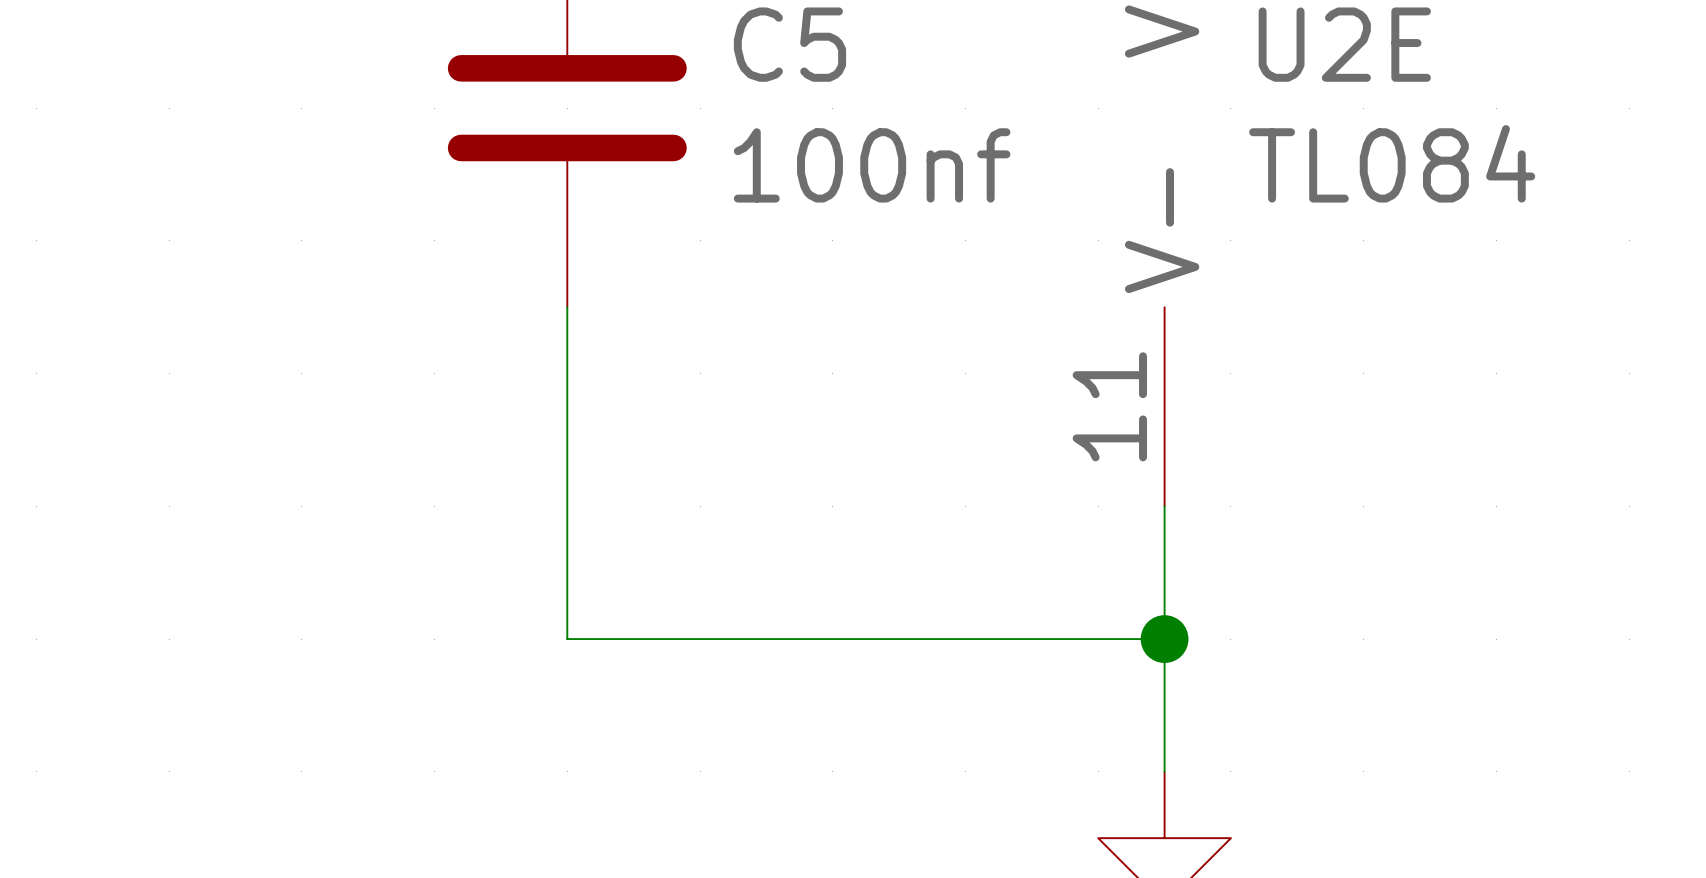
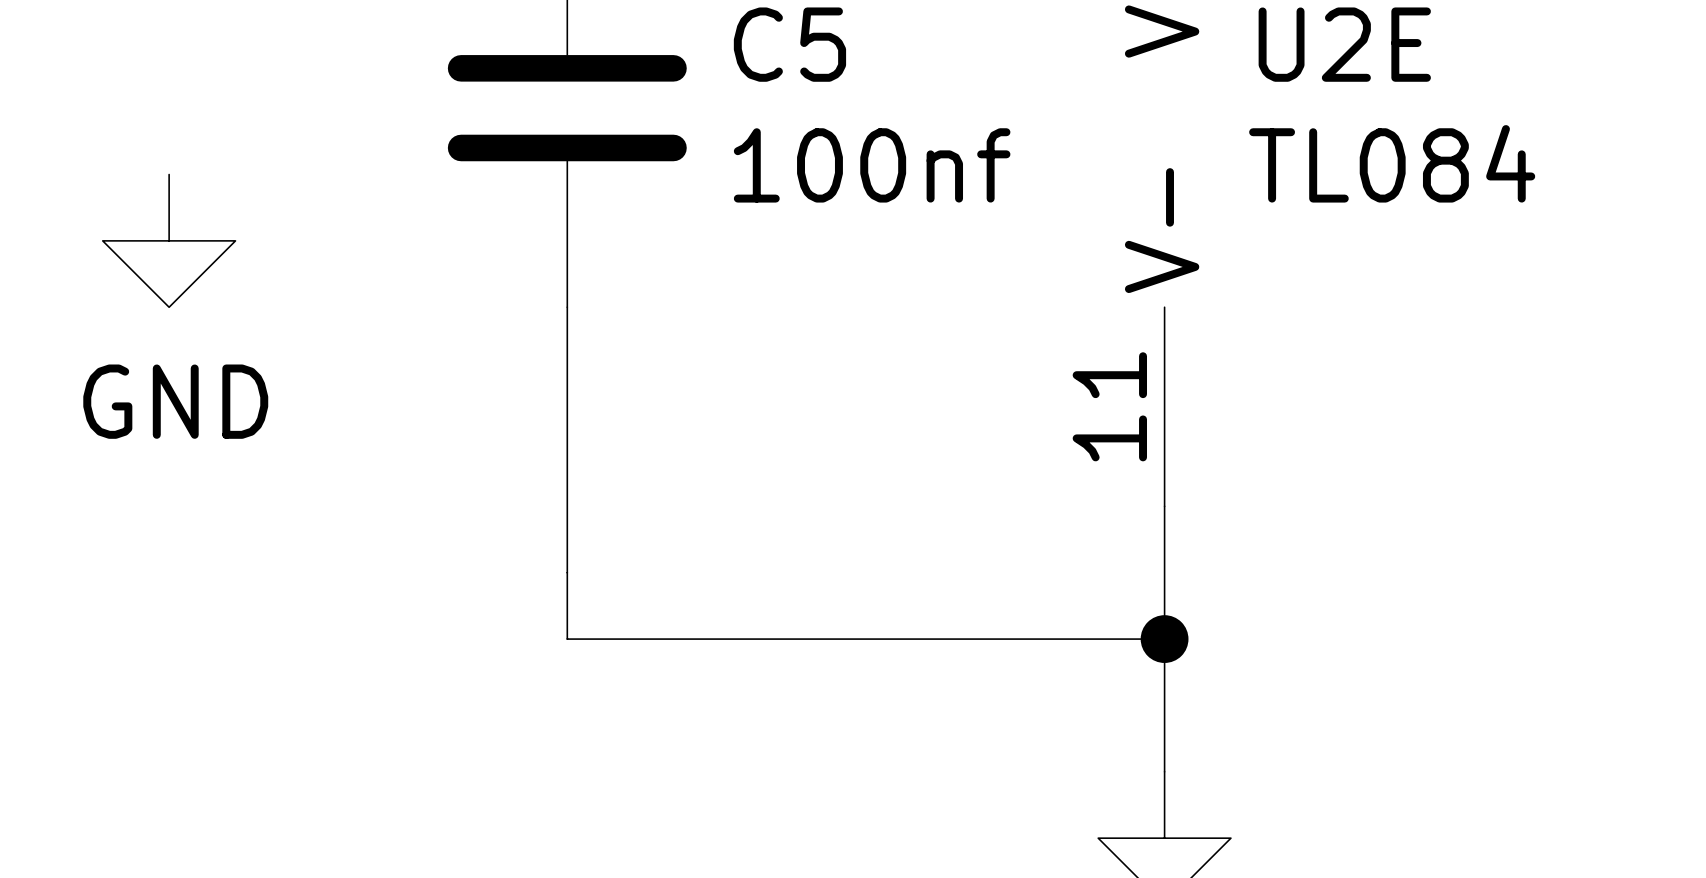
power symbol: none -> GND (169, 240)

